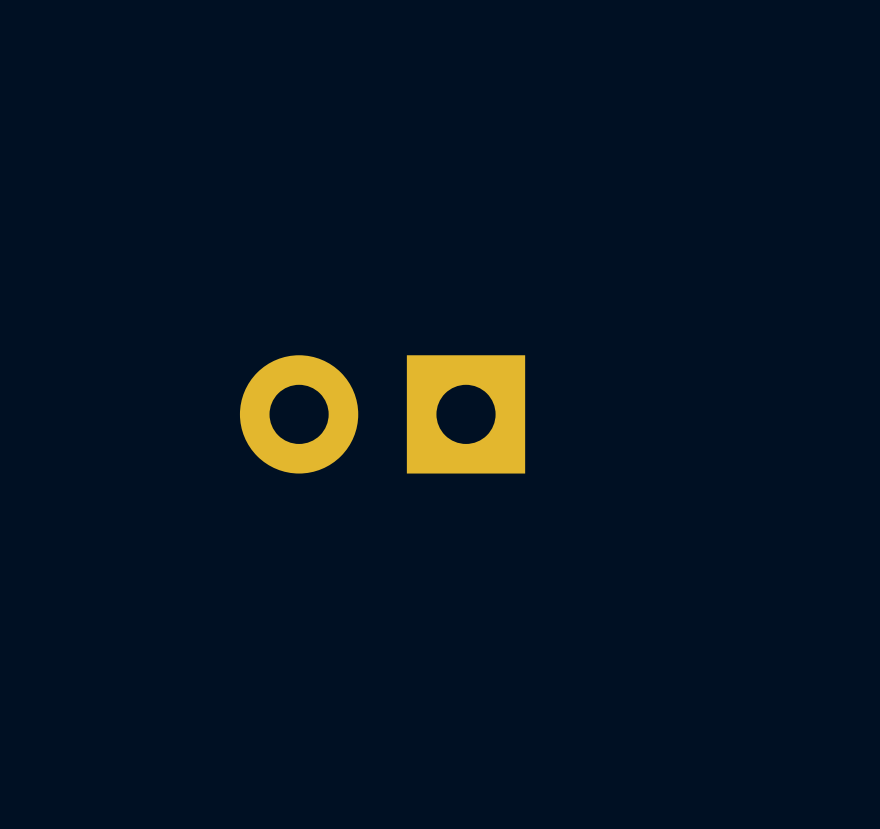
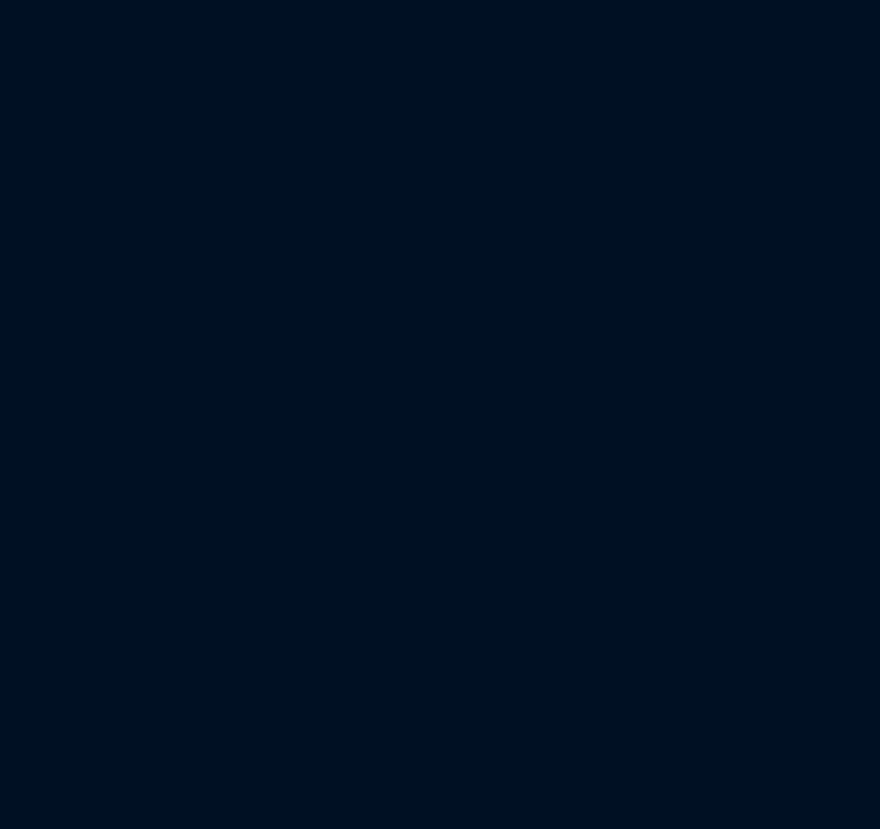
part: (382, 414) -> none

